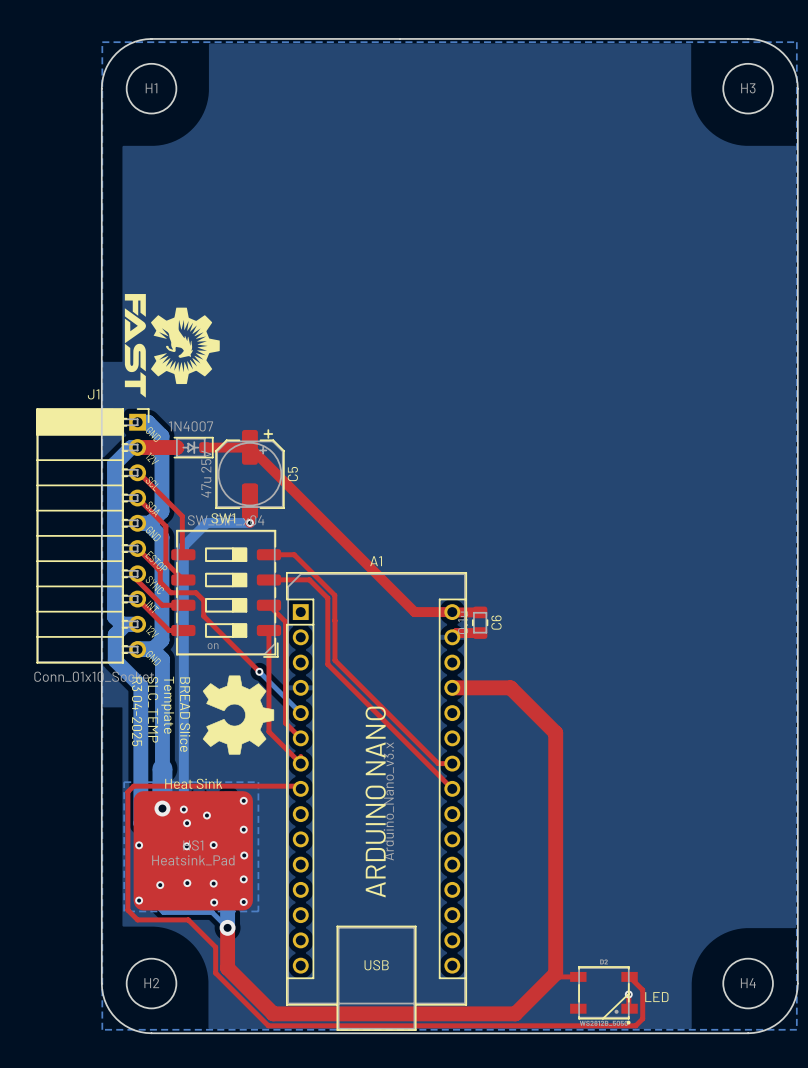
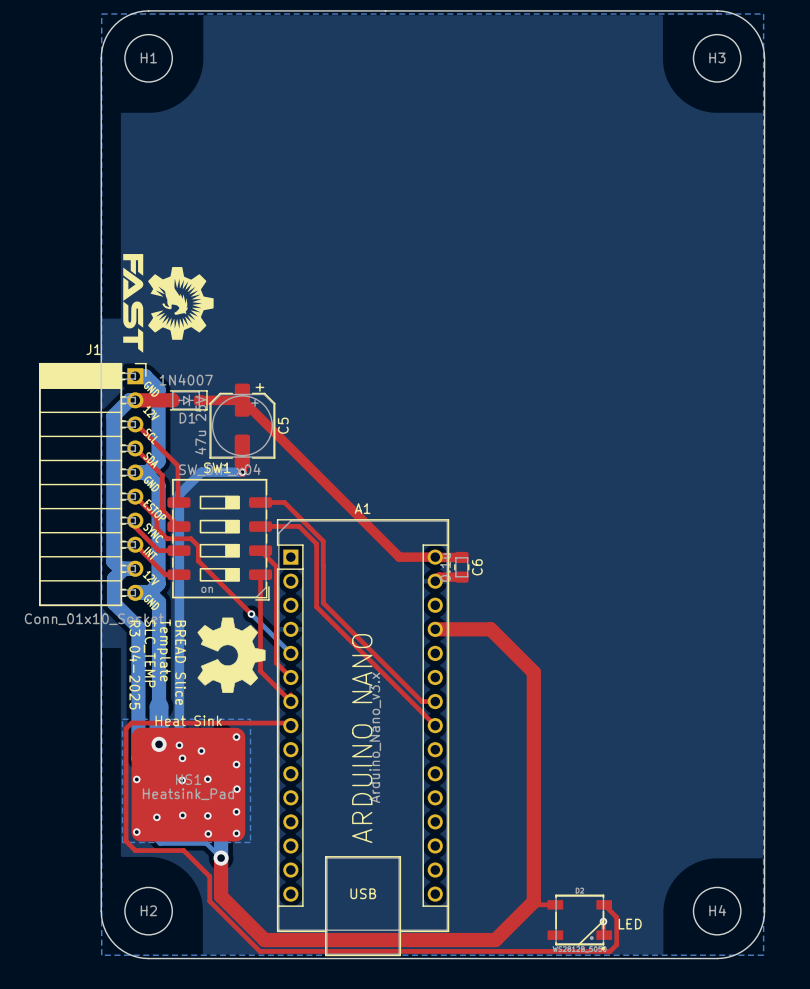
D1 name: none -> D1 (187, 418)

